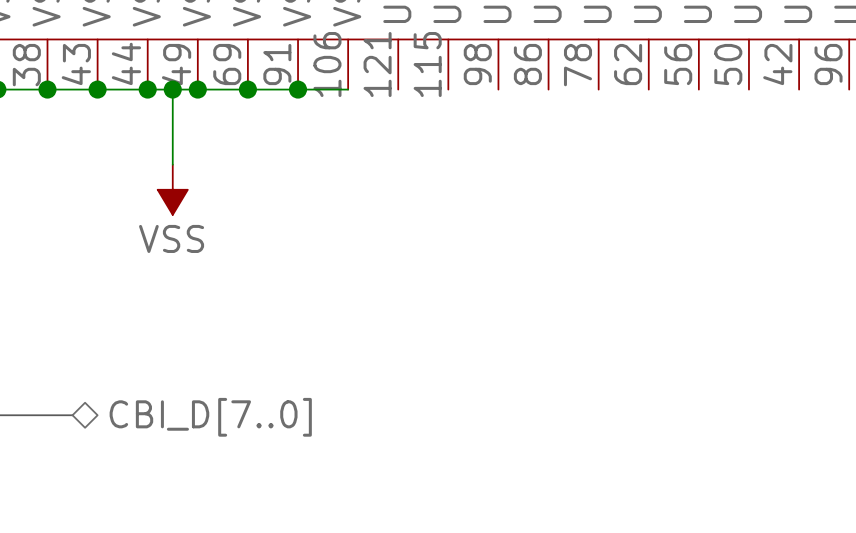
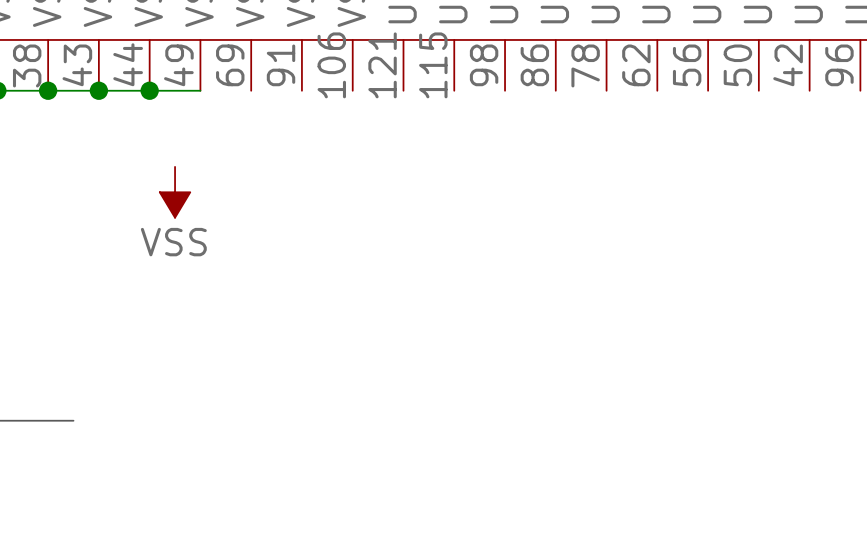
wire: (172, 89) (172, 164) -> none
junction: (172, 89) -> none
wire: (197, 89) (348, 89) -> none
junction: (197, 89) -> none
junction: (247, 89) -> none
junction: (298, 89) -> none
hierarchical label: CBI_D[7..0] (210, 417) -> none

